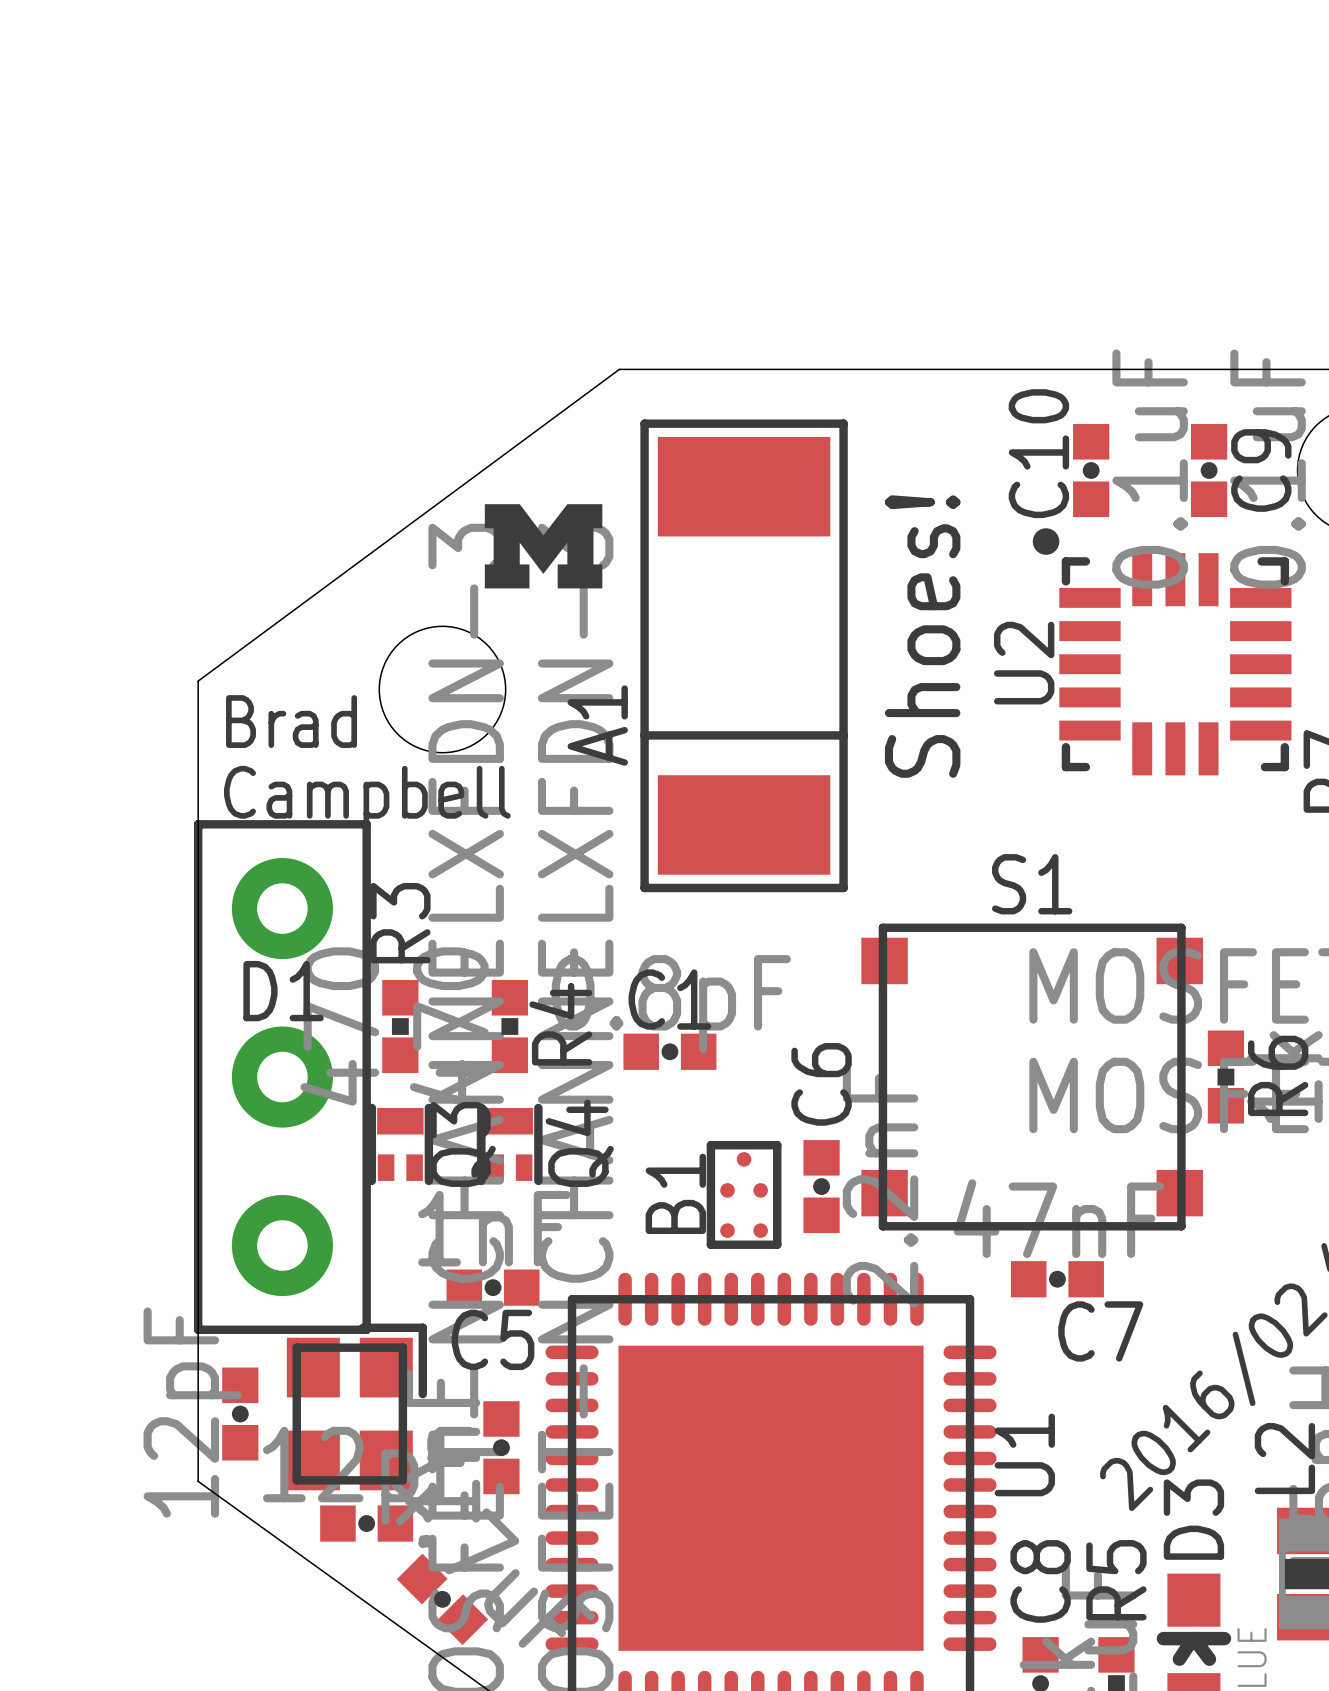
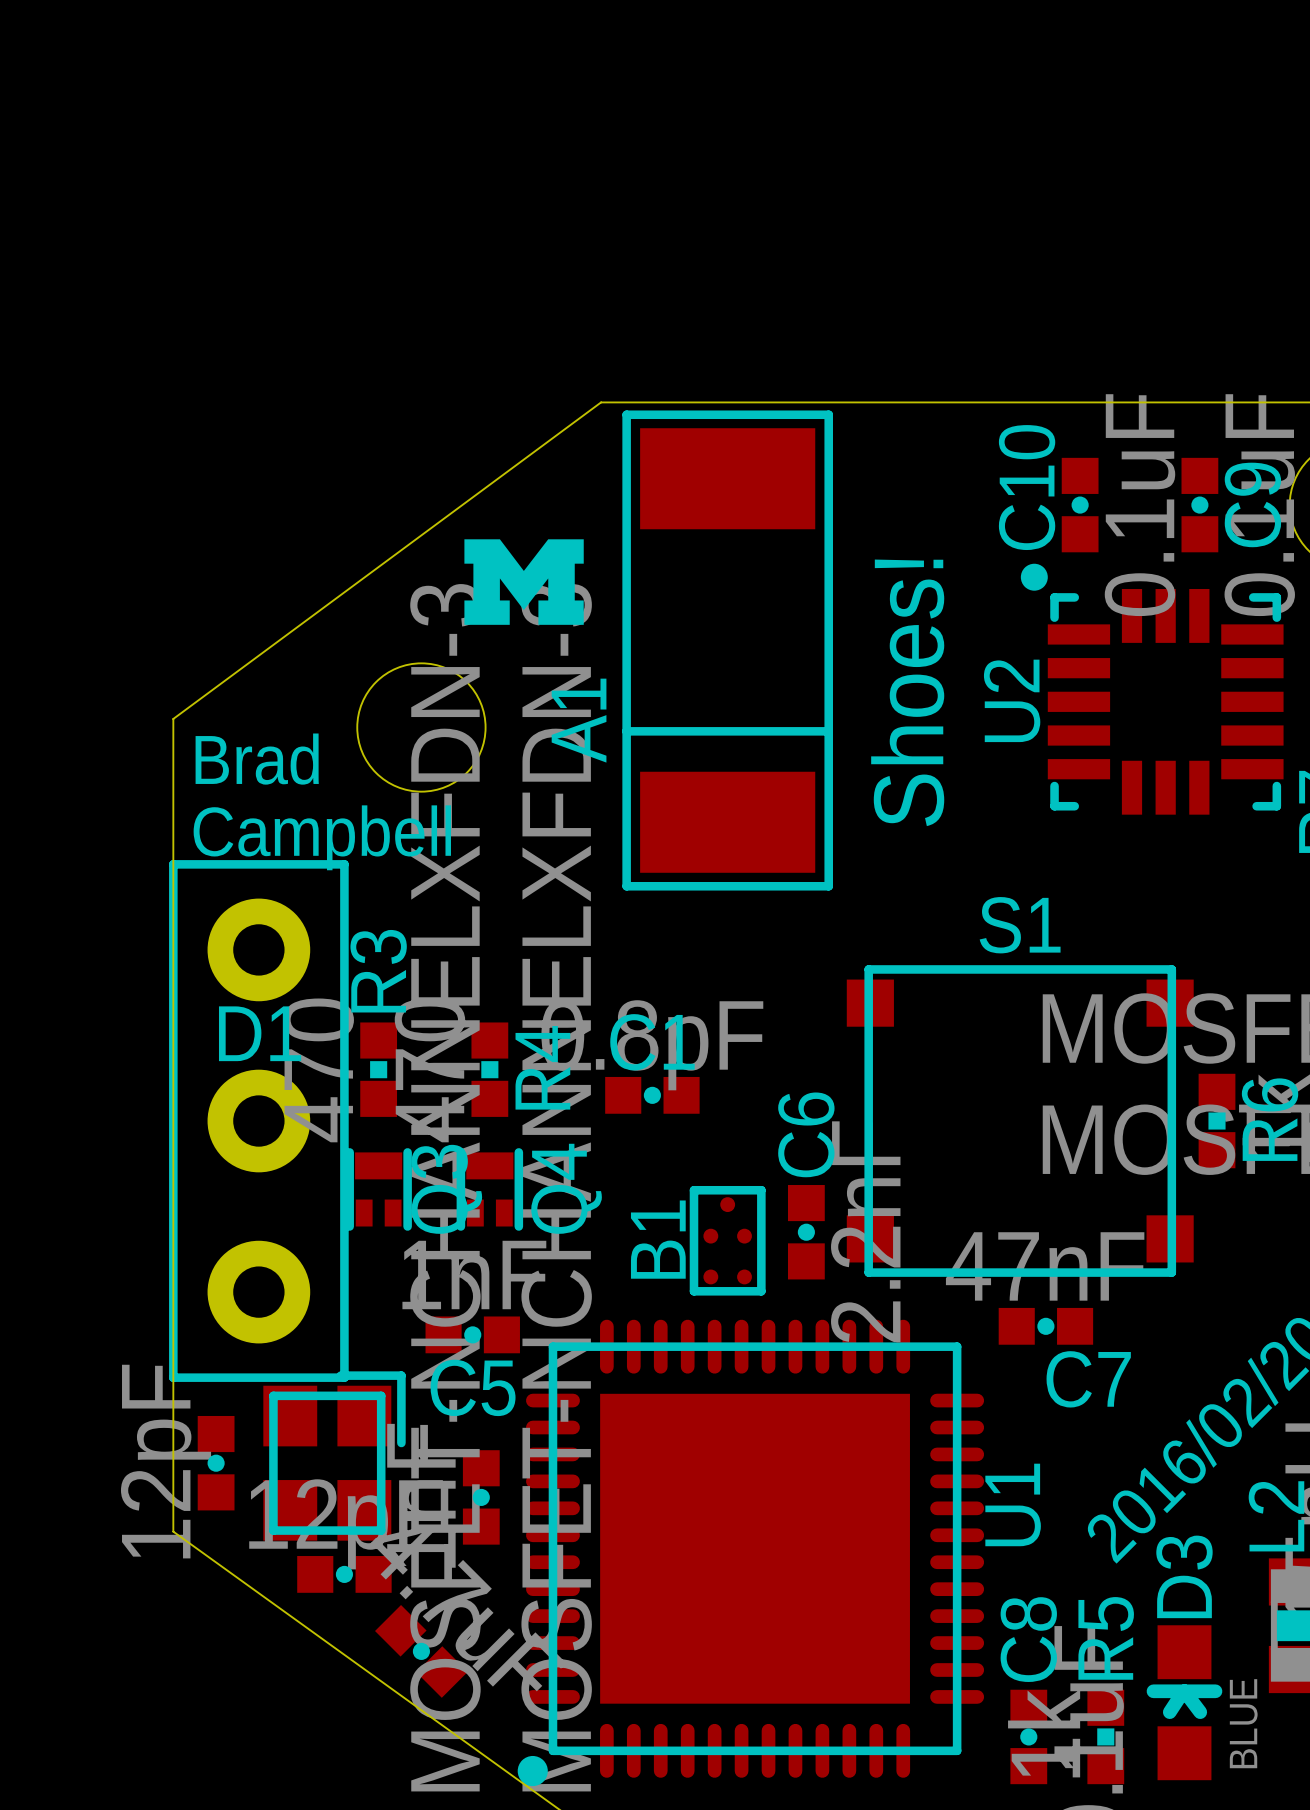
A1 position: (744, 655) -> (727, 650)

